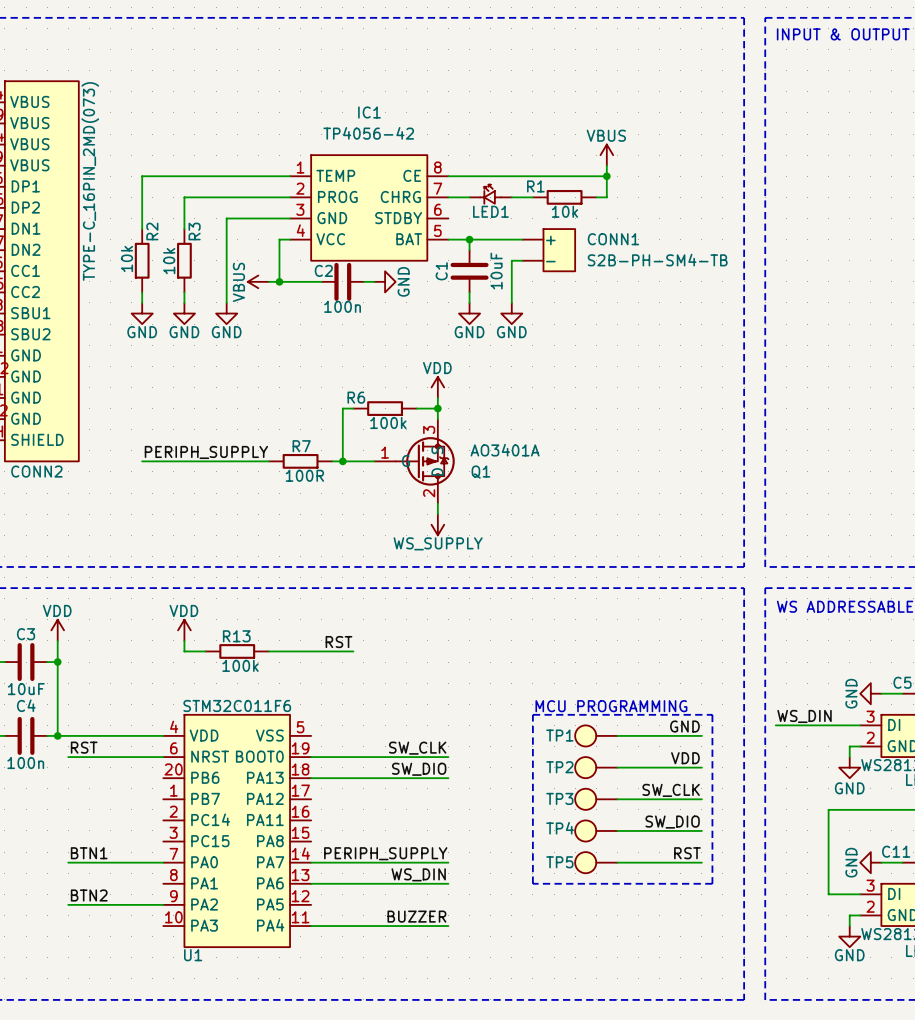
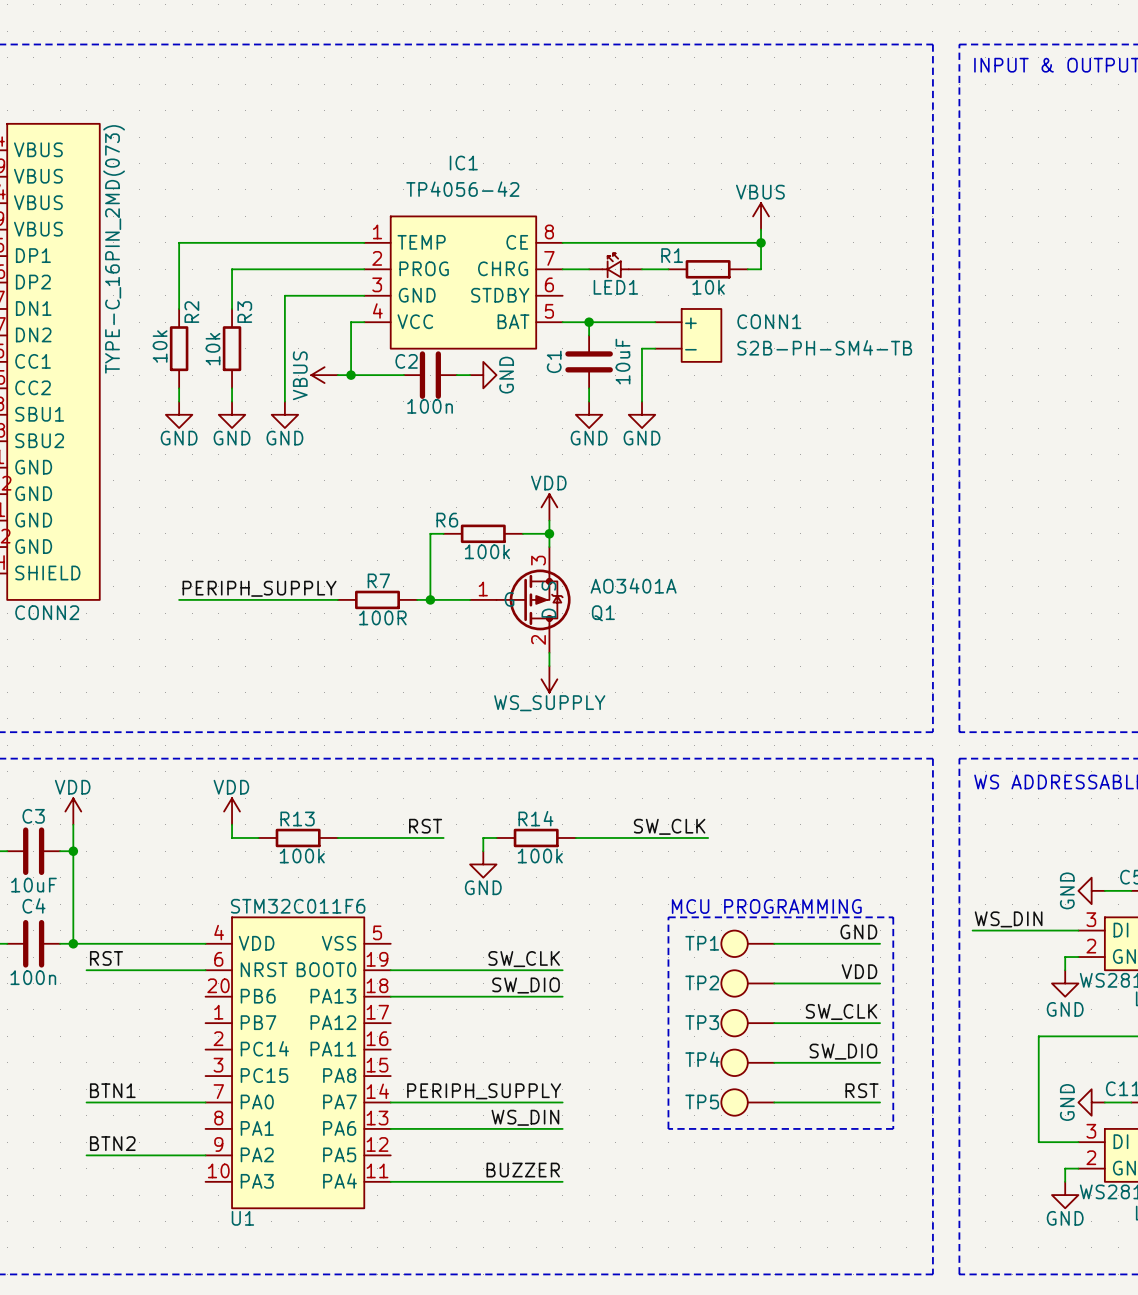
label: none -> SW_CLK (669, 826)
wire: none -> (496, 837) (483, 837) (483, 851)
R14: none -> 100k (536, 837)
wire: none -> (575, 837) (708, 837)
power symbol: none -> GND (483, 864)

